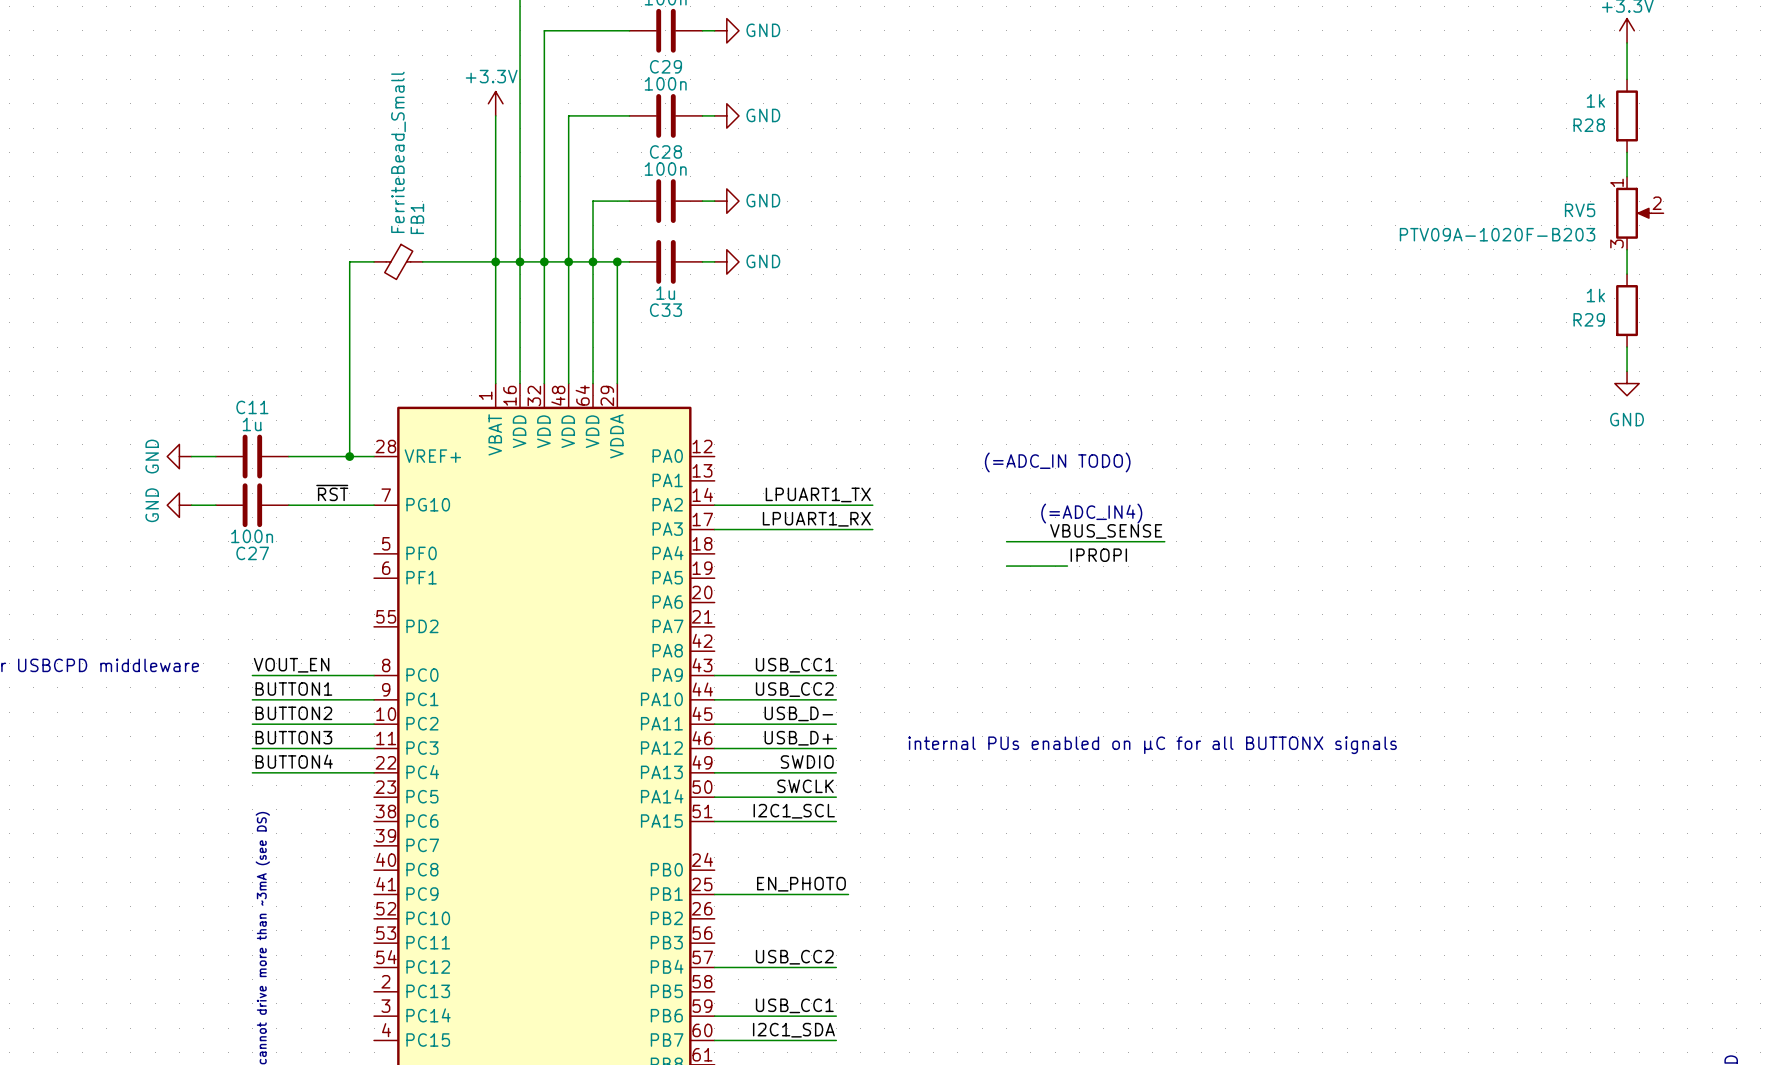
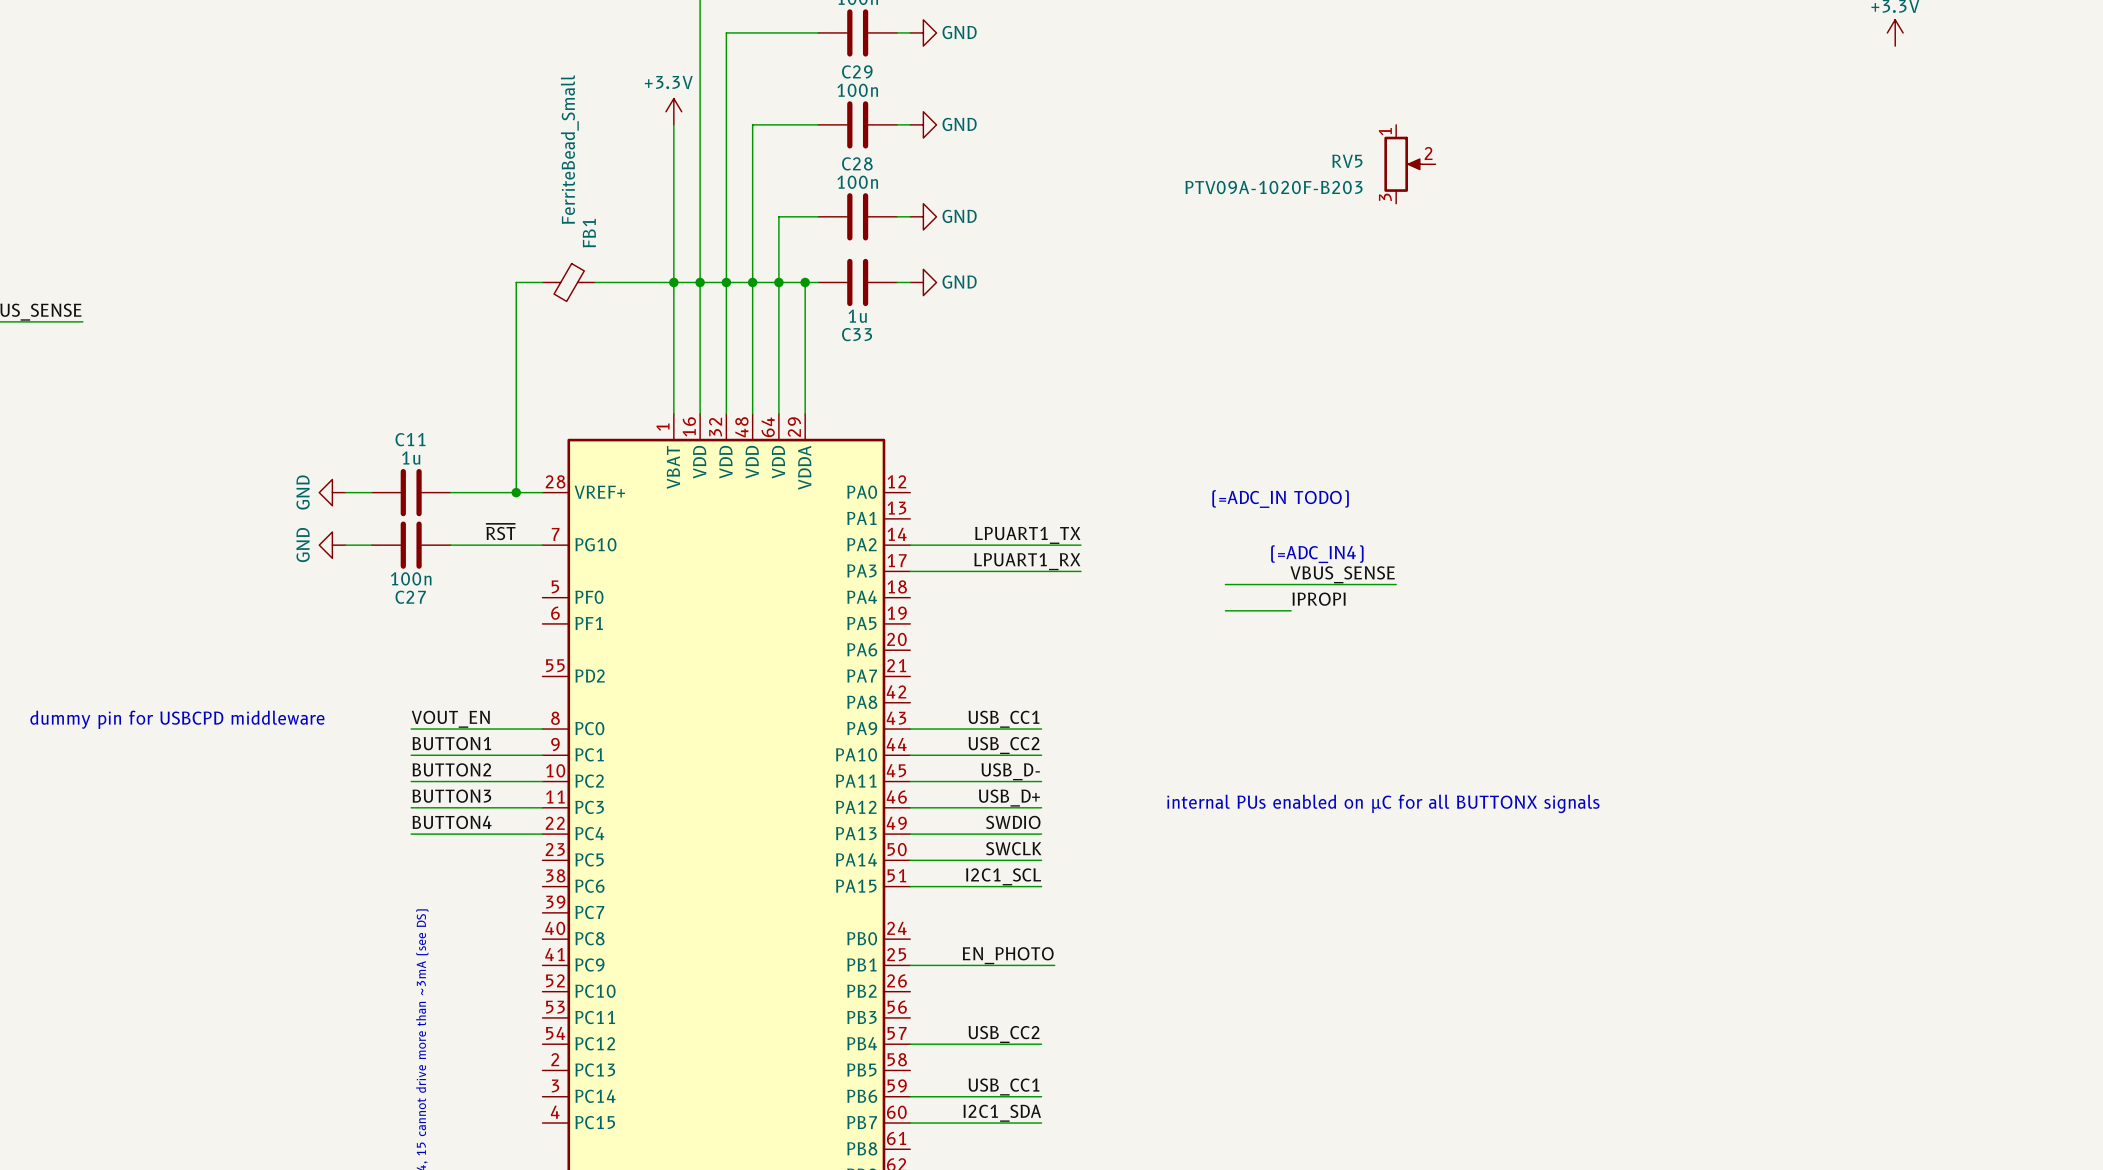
wire: (1627, 42) (1627, 79) -> none
R28: 1k (1627, 115) -> none
wire: (1627, 152) (1627, 176) -> none
RV5 position: (1639, 213) -> (1409, 164)
wire: (1627, 249) (1627, 274) -> none
R29: 1k (1627, 310) -> none
wire: (1627, 347) (1627, 371) -> none
power symbol: GND (1627, 383) -> none

